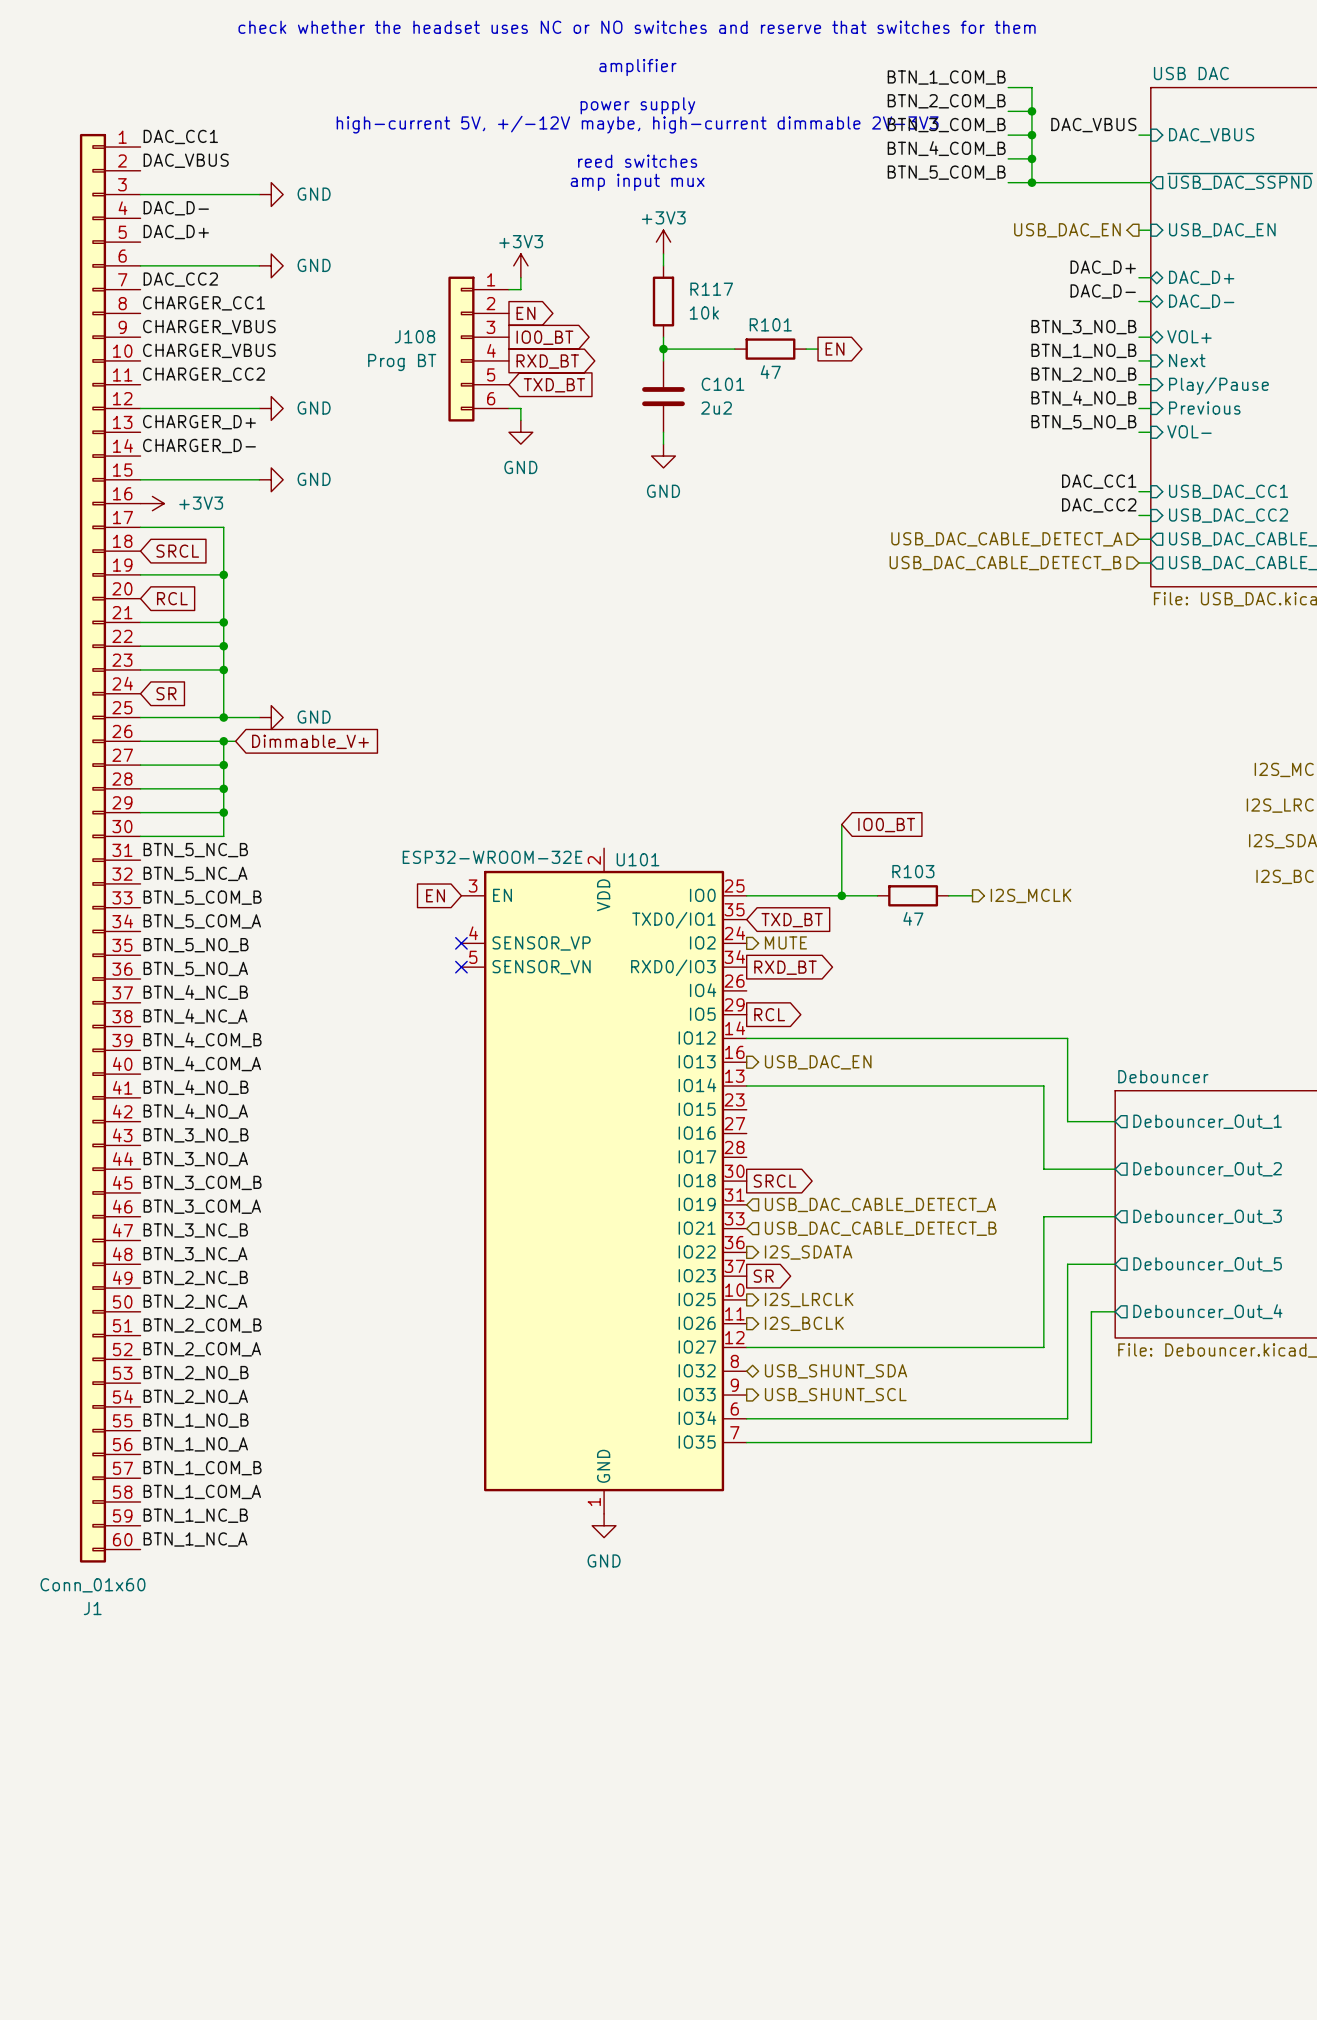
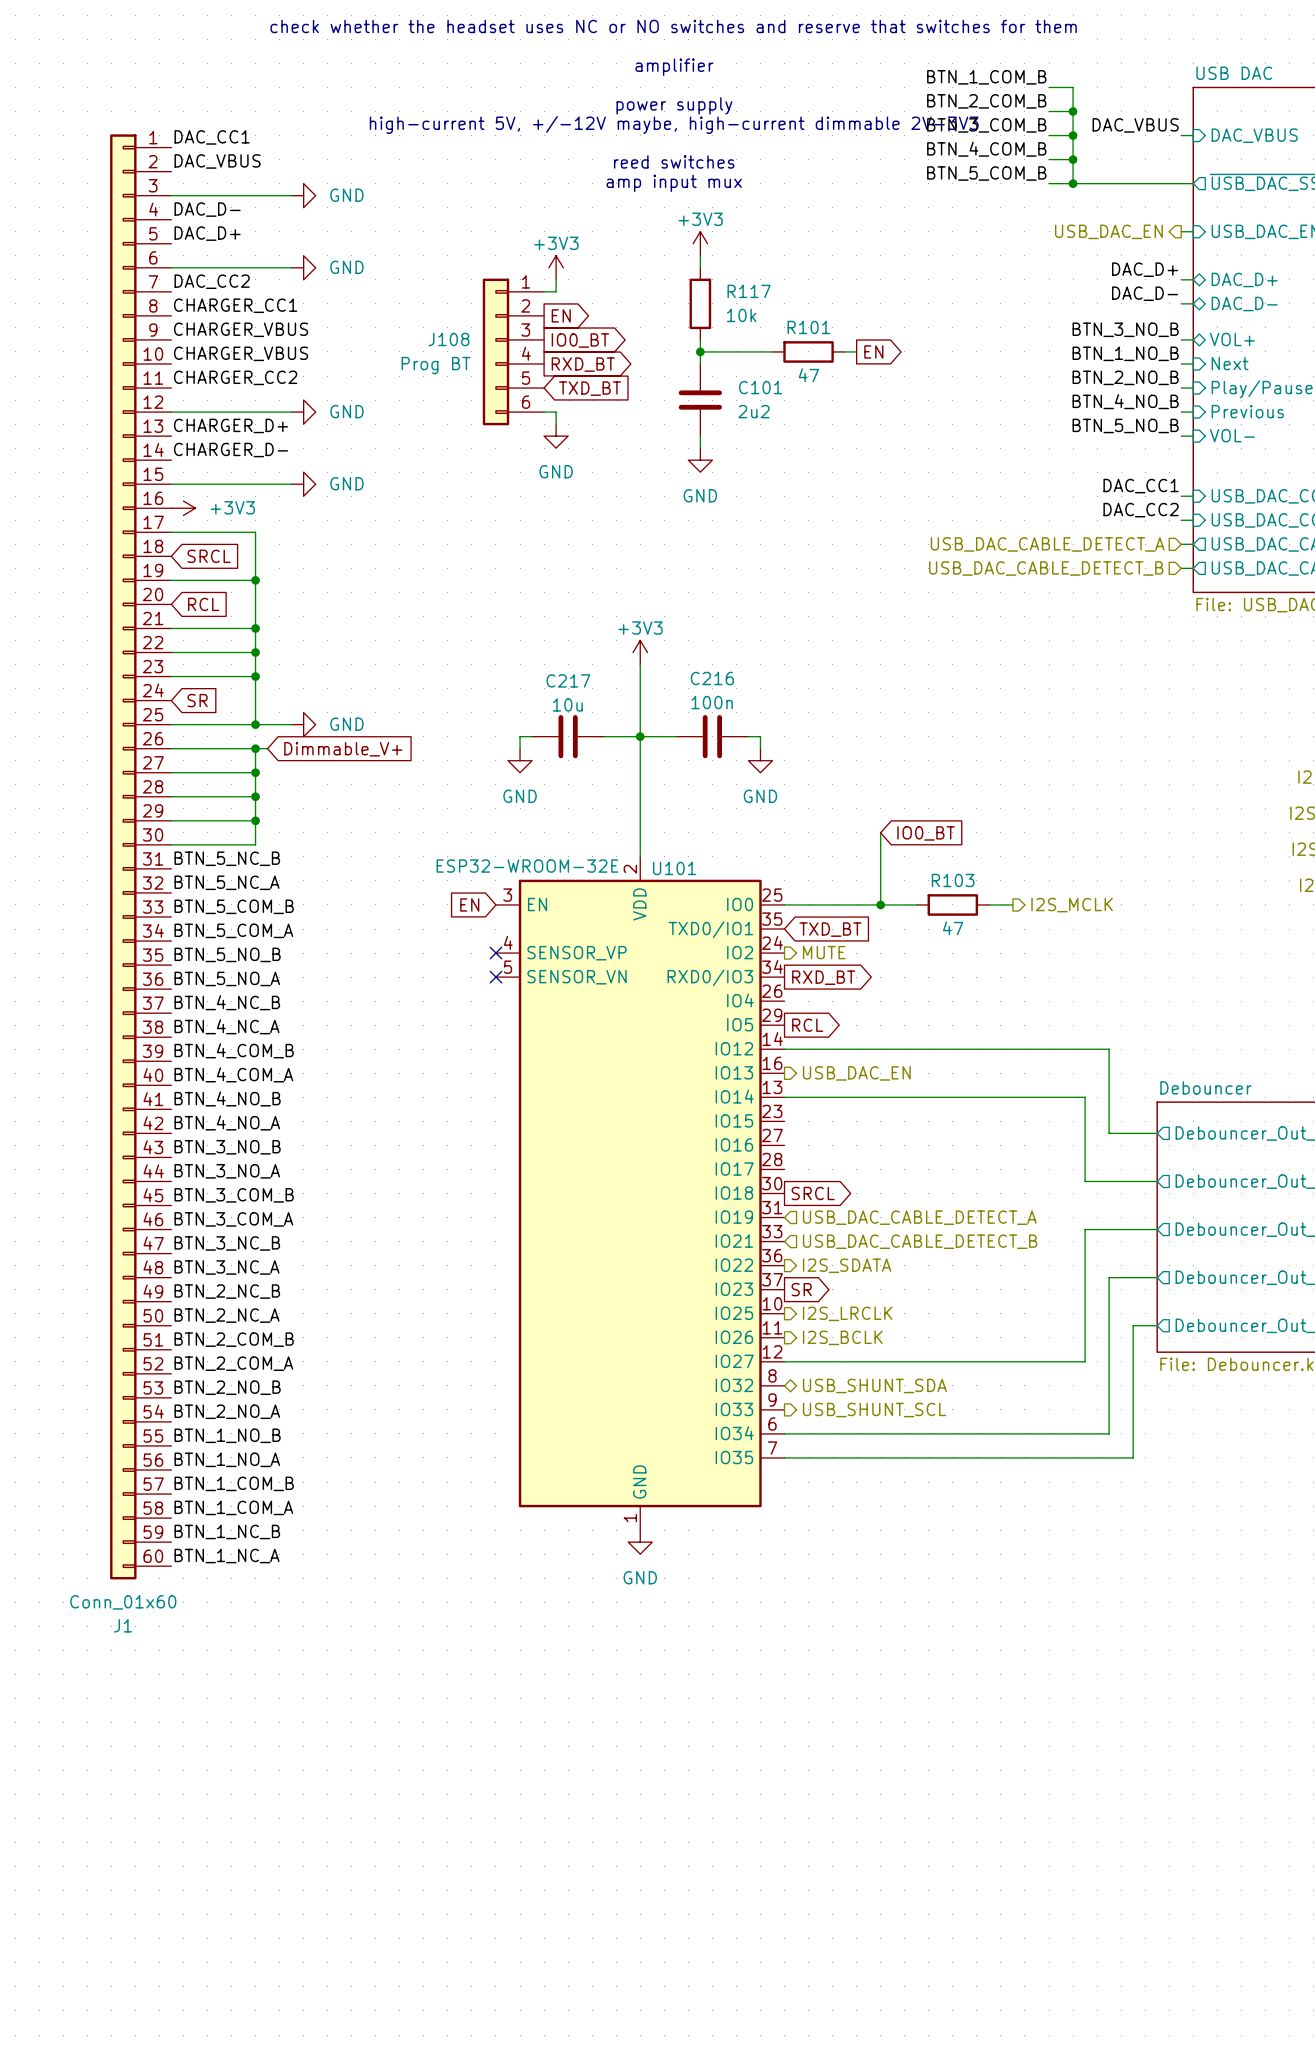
power symbol: none -> +3V3 (640, 652)
wire: none -> (640, 664) (640, 856)
wire: none -> (532, 736) (520, 736) (520, 748)
C217: none -> 10u (568, 736)
wire: none -> (604, 736) (676, 736)
junction: none -> (640, 736)
C216: none -> 100n (712, 736)
wire: none -> (748, 736) (760, 736) (760, 748)
power symbol: none -> GND (520, 760)
power symbol: none -> GND (760, 760)

